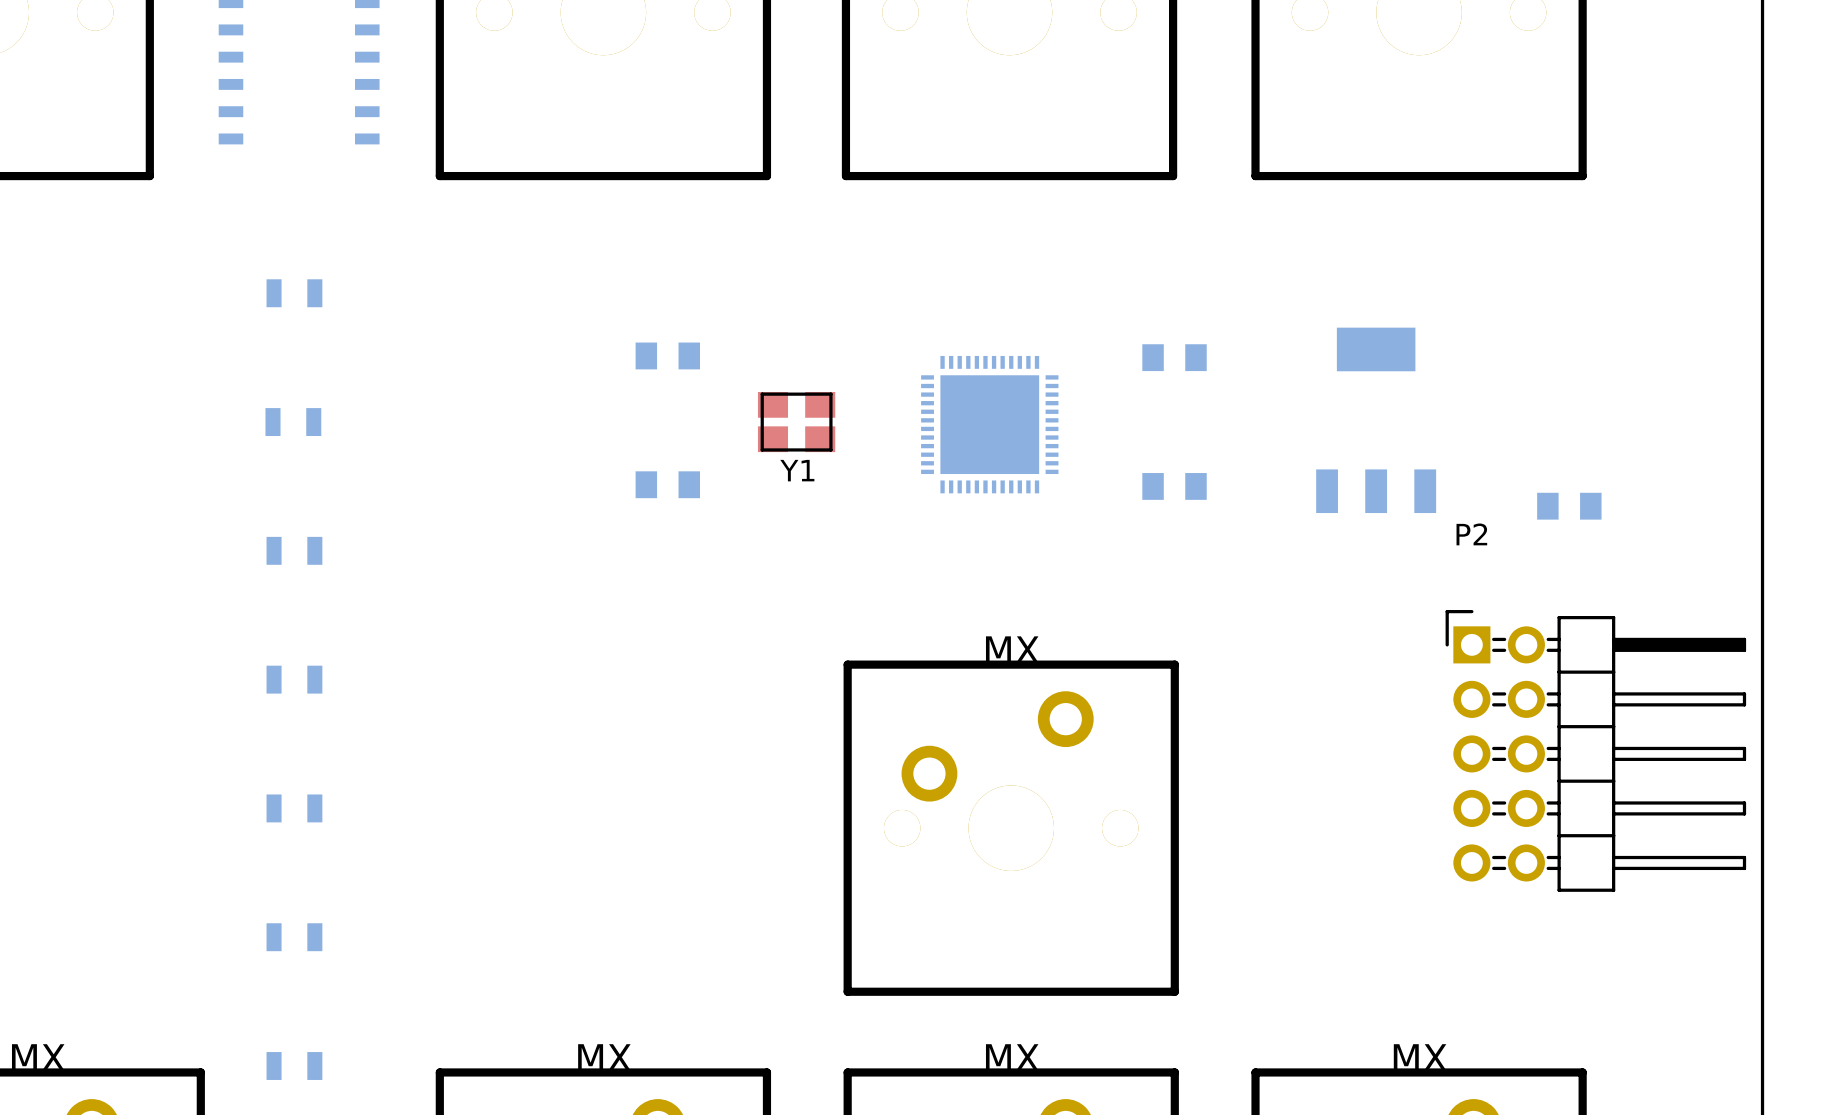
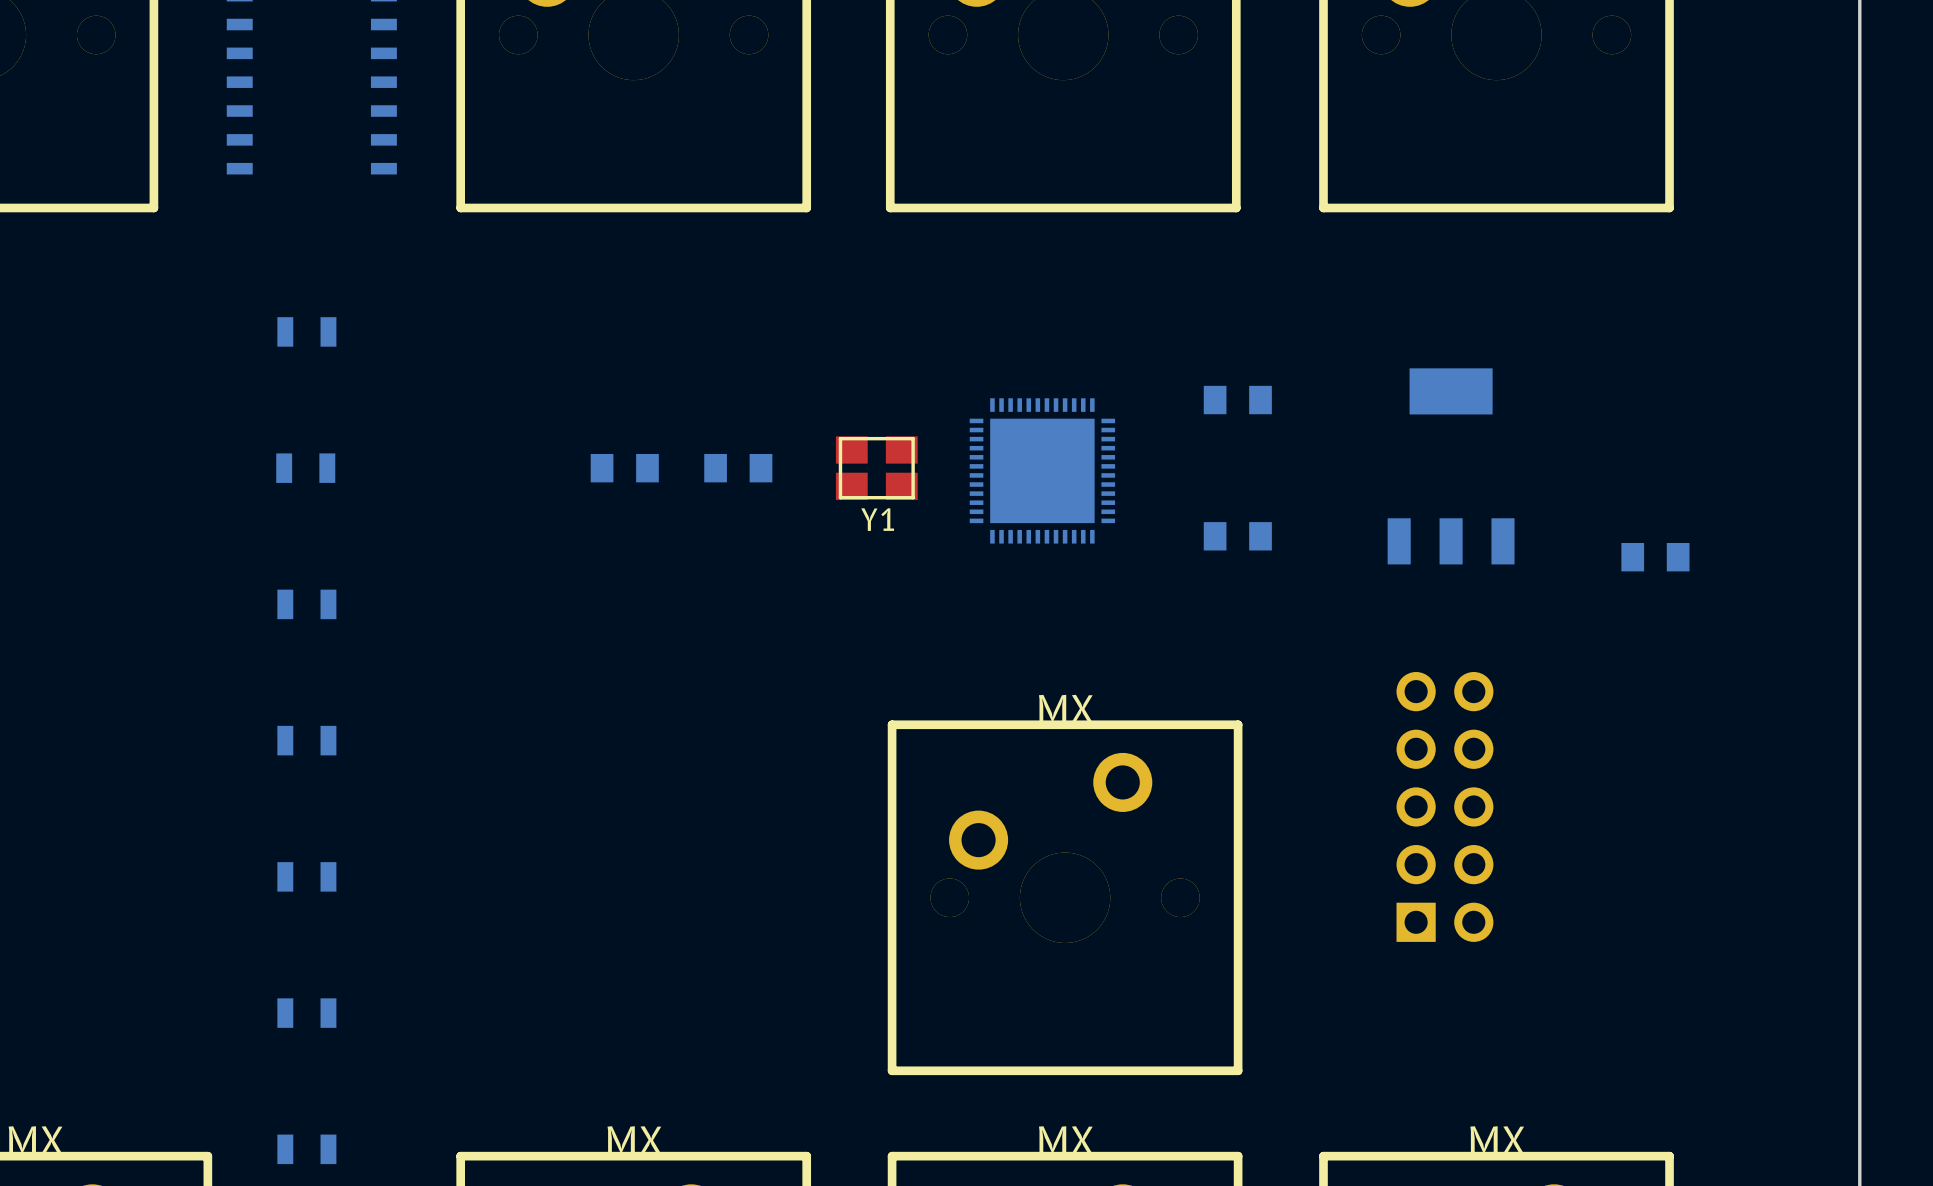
part: (667, 355) -> none
part: none -> (624, 468)
part: none -> (738, 468)
Y1 position: (796, 422) -> (876, 468)
part: (667, 484) -> none
P2 side: top (1595, 750) -> bottom (1444, 806)

